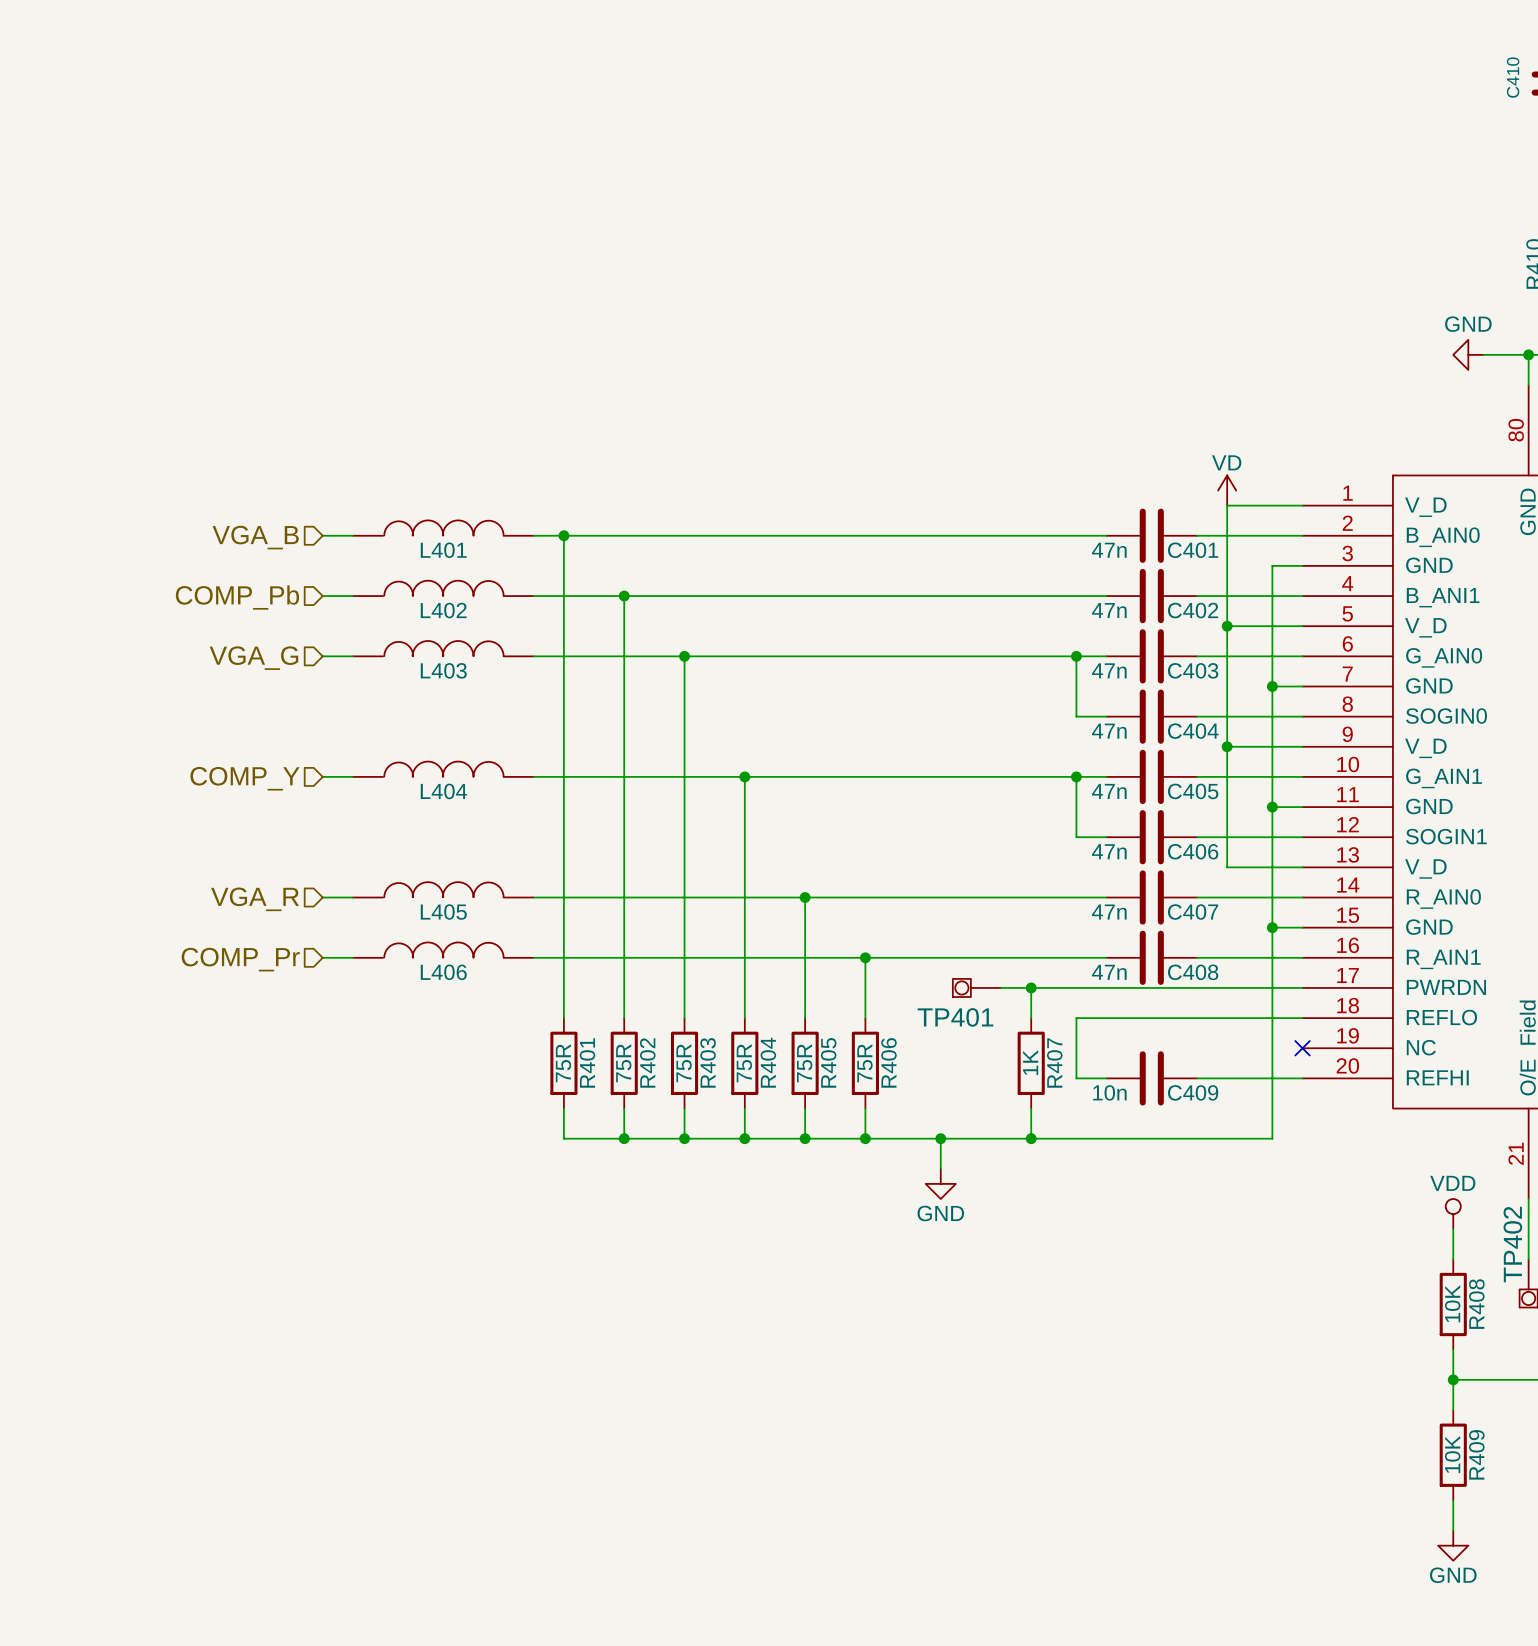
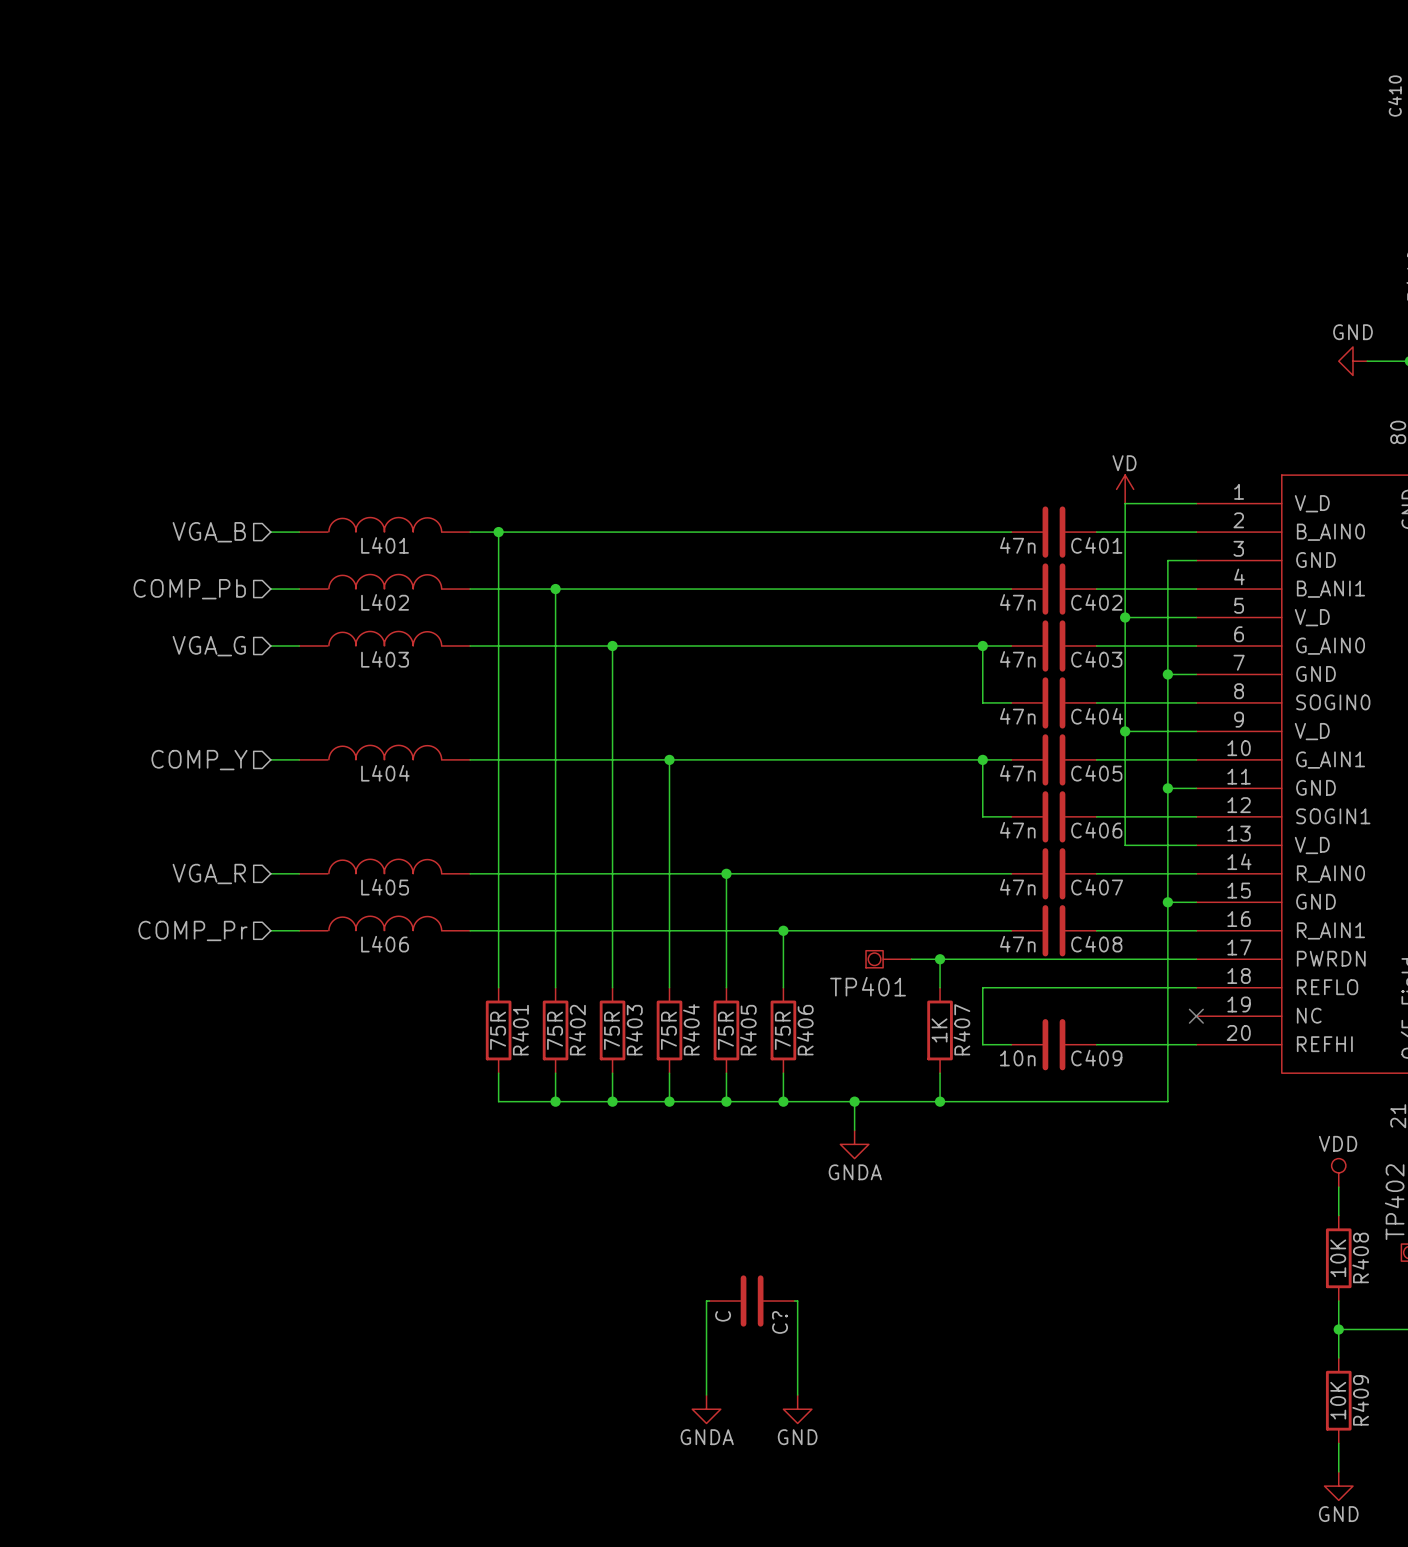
power symbol: GND (940, 1183) -> GNDA (854, 1144)
wire: none -> (709, 1301) (706, 1301) (706, 1394)
C?: none -> C (752, 1301)
wire: none -> (794, 1301) (797, 1301) (797, 1394)
power symbol: none -> GNDA (706, 1409)
power symbol: none -> GND (797, 1409)

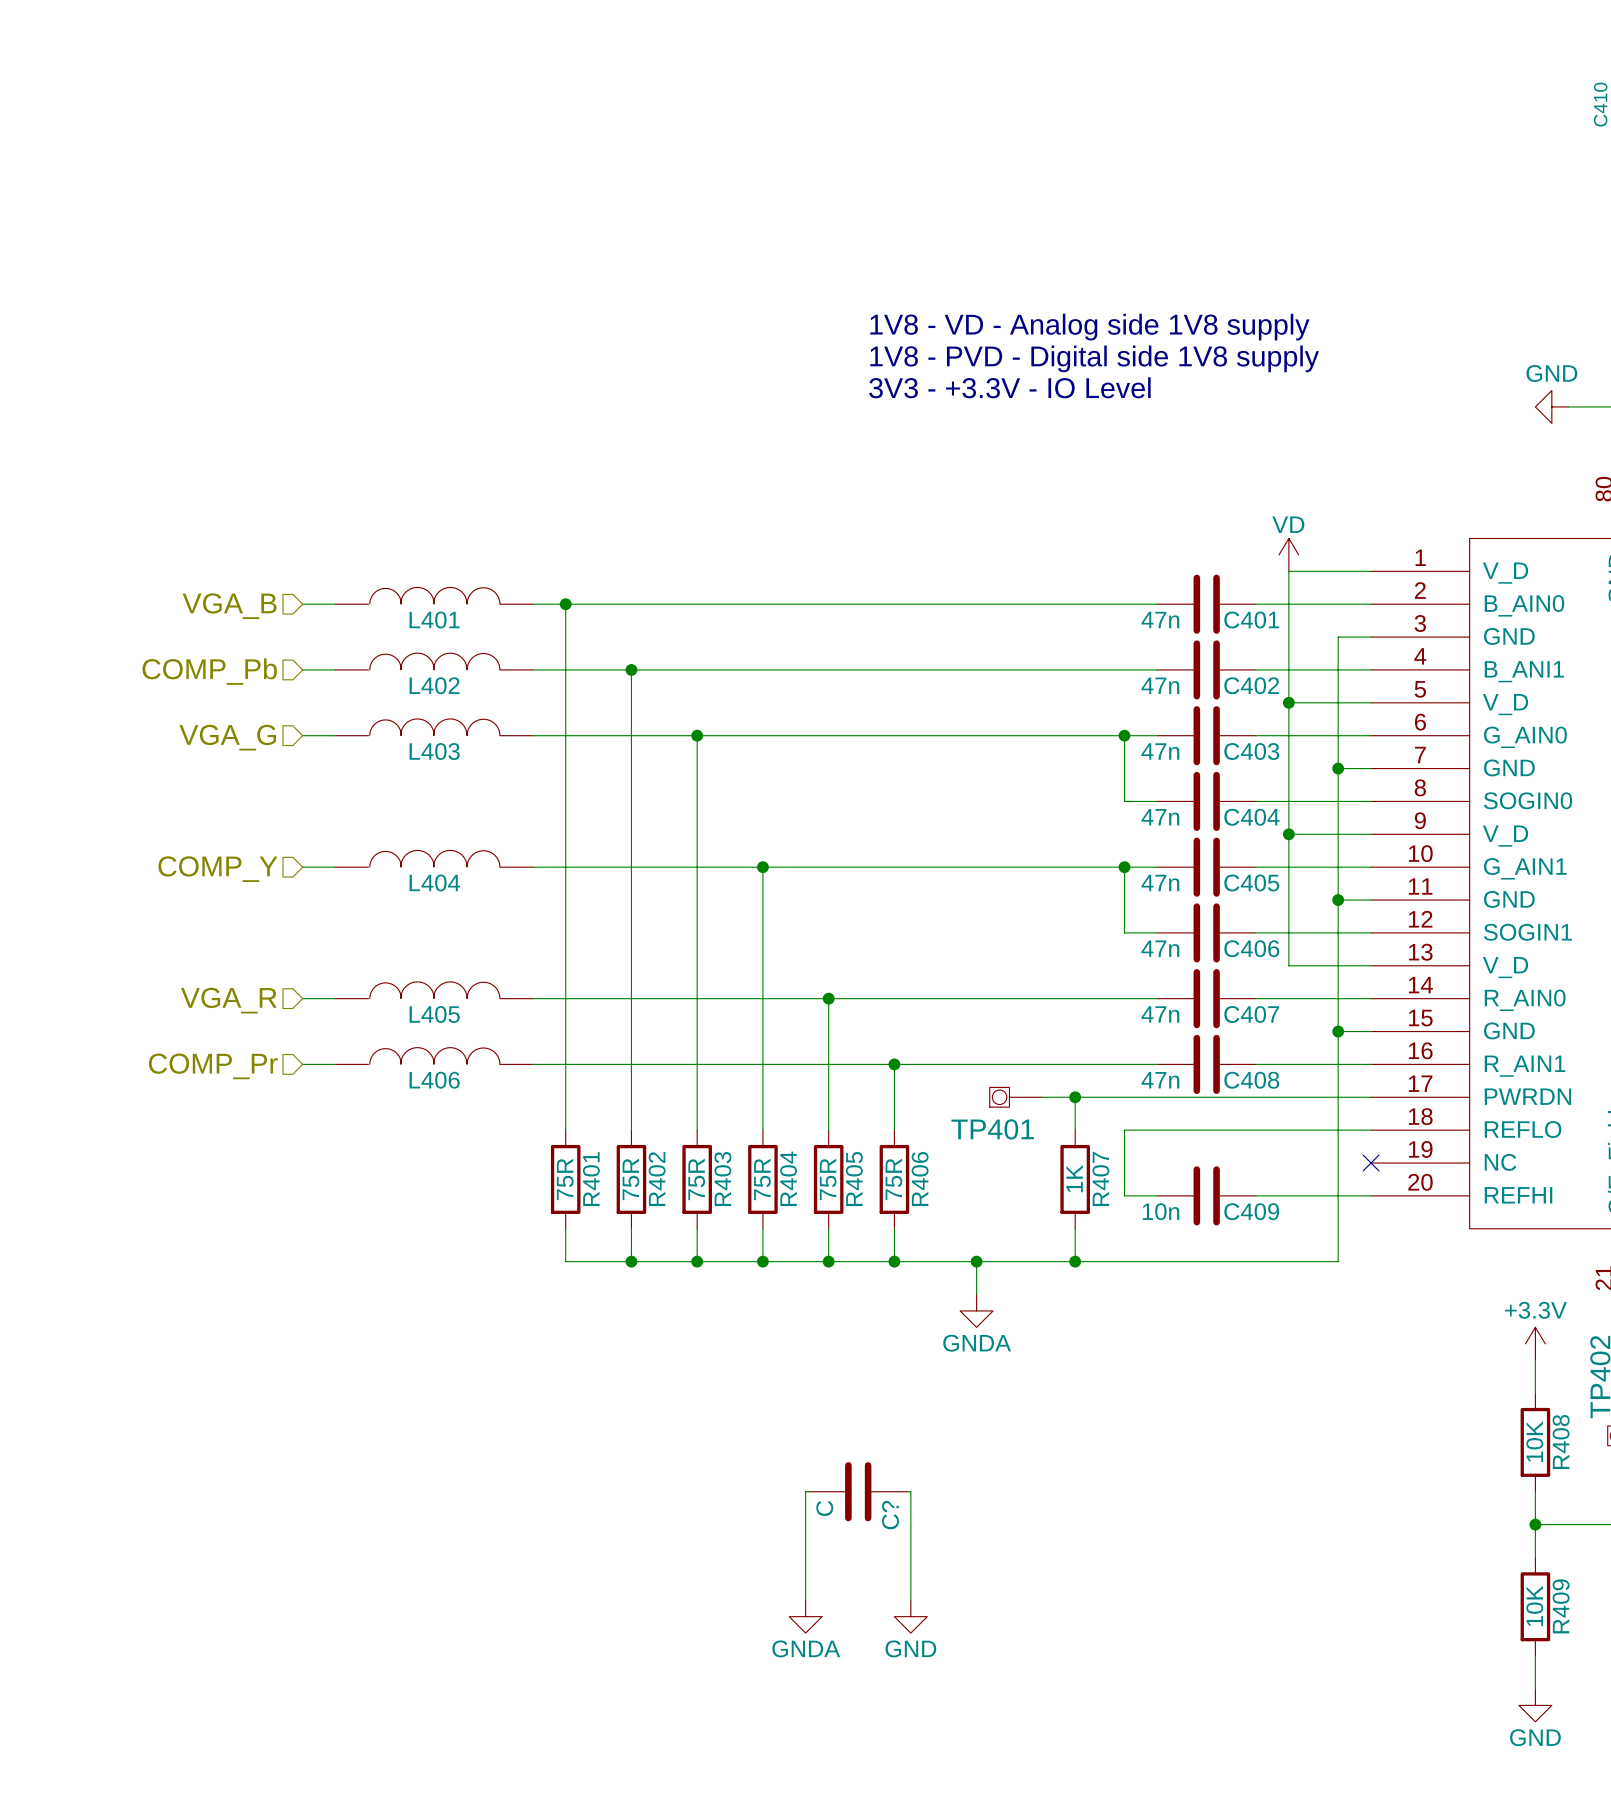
text: none -> 1V8 - VD - Analog side 1V8 supply (1089, 327)
text: none -> 1V8 - PVD - Digital side 1V8 supply (1094, 358)
text: none -> 3V3 - +3.3V - IO Level (1009, 387)
power symbol: VDD (1338, 1172) -> +3.3V (1535, 1343)

